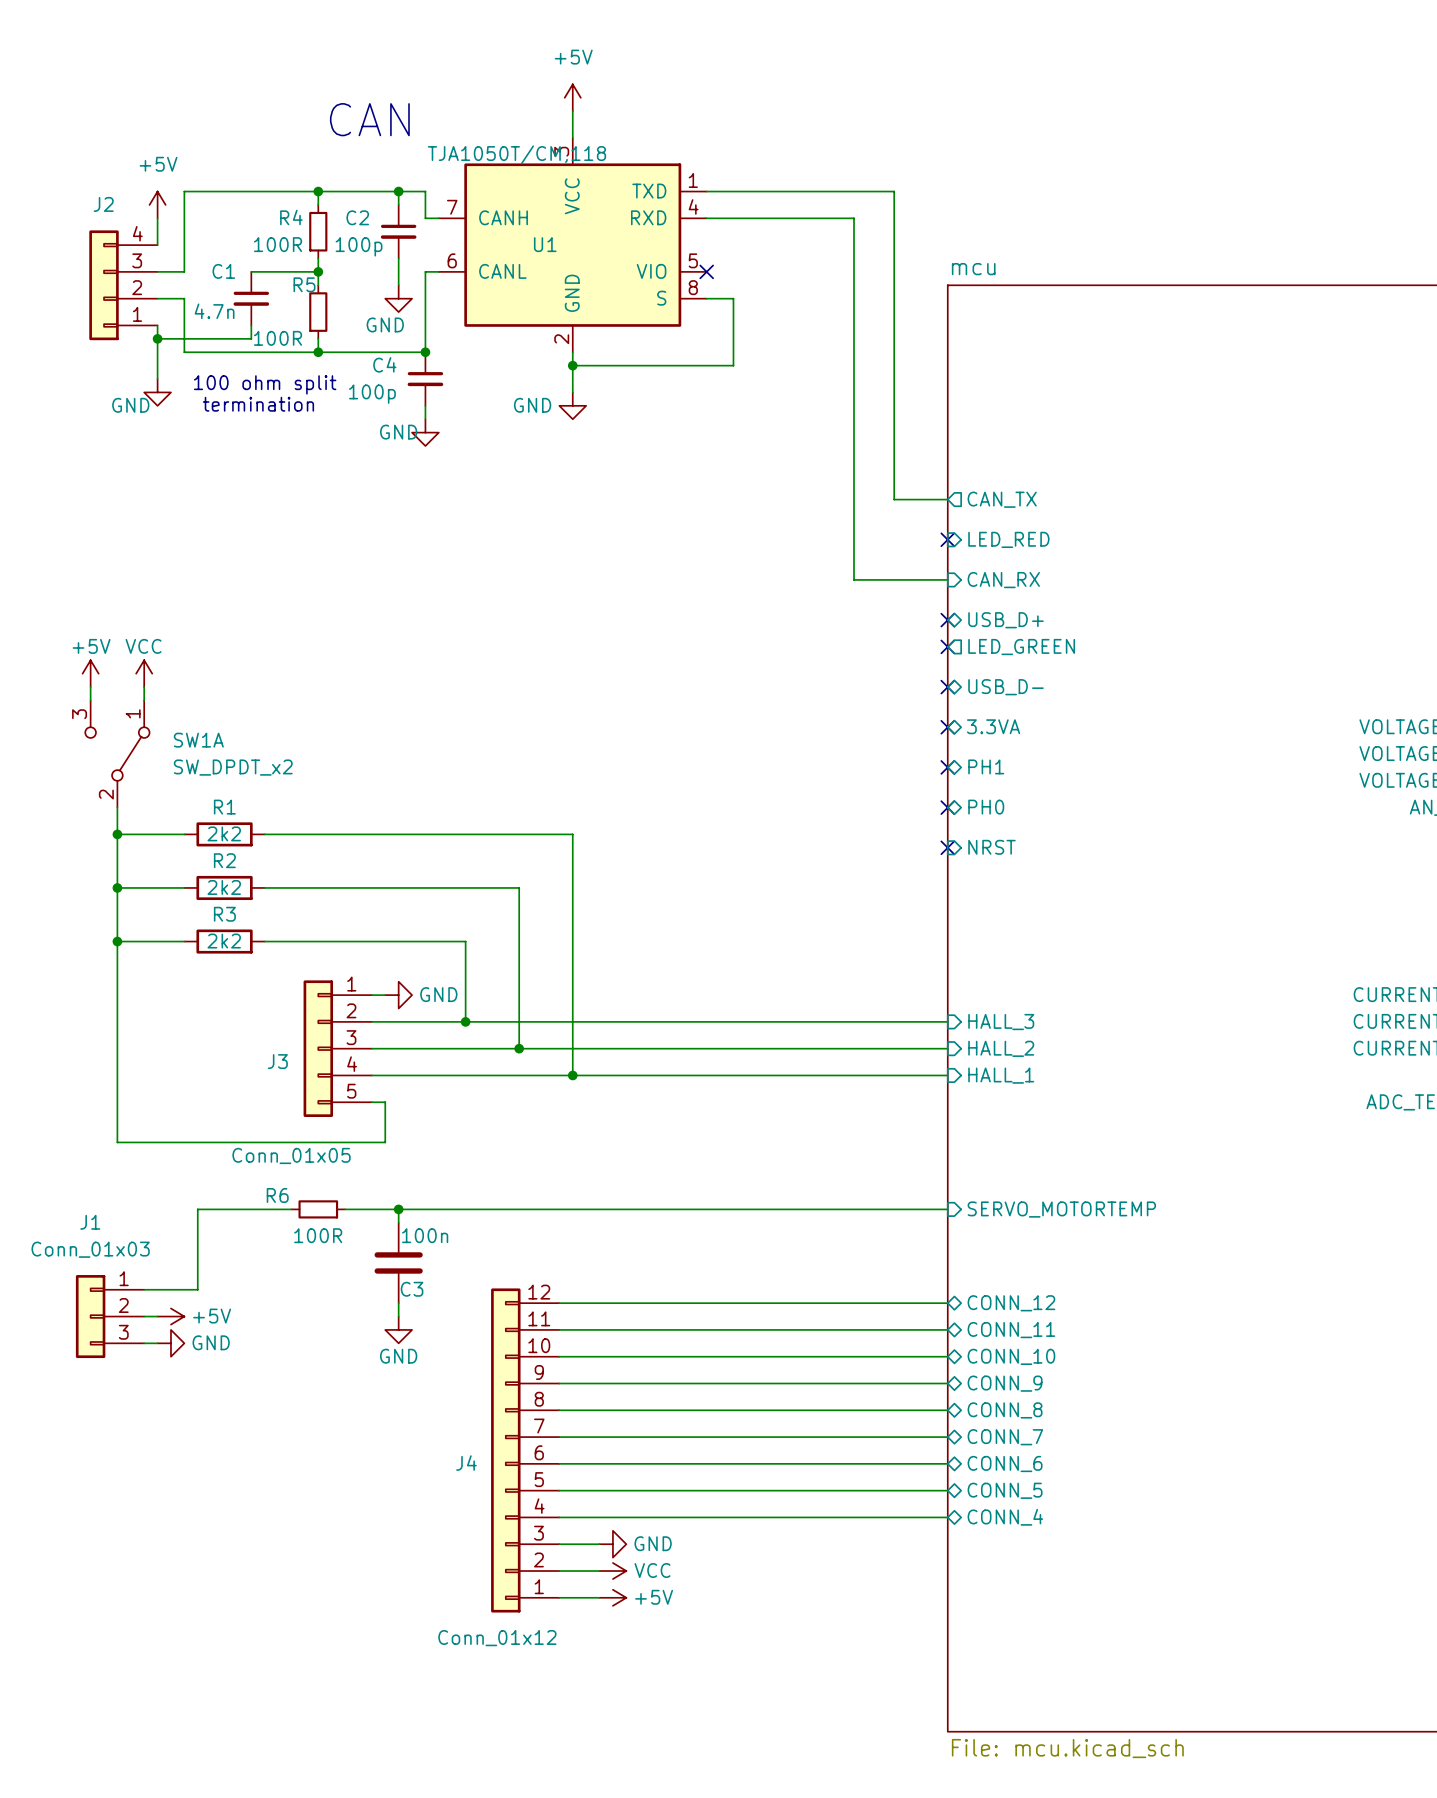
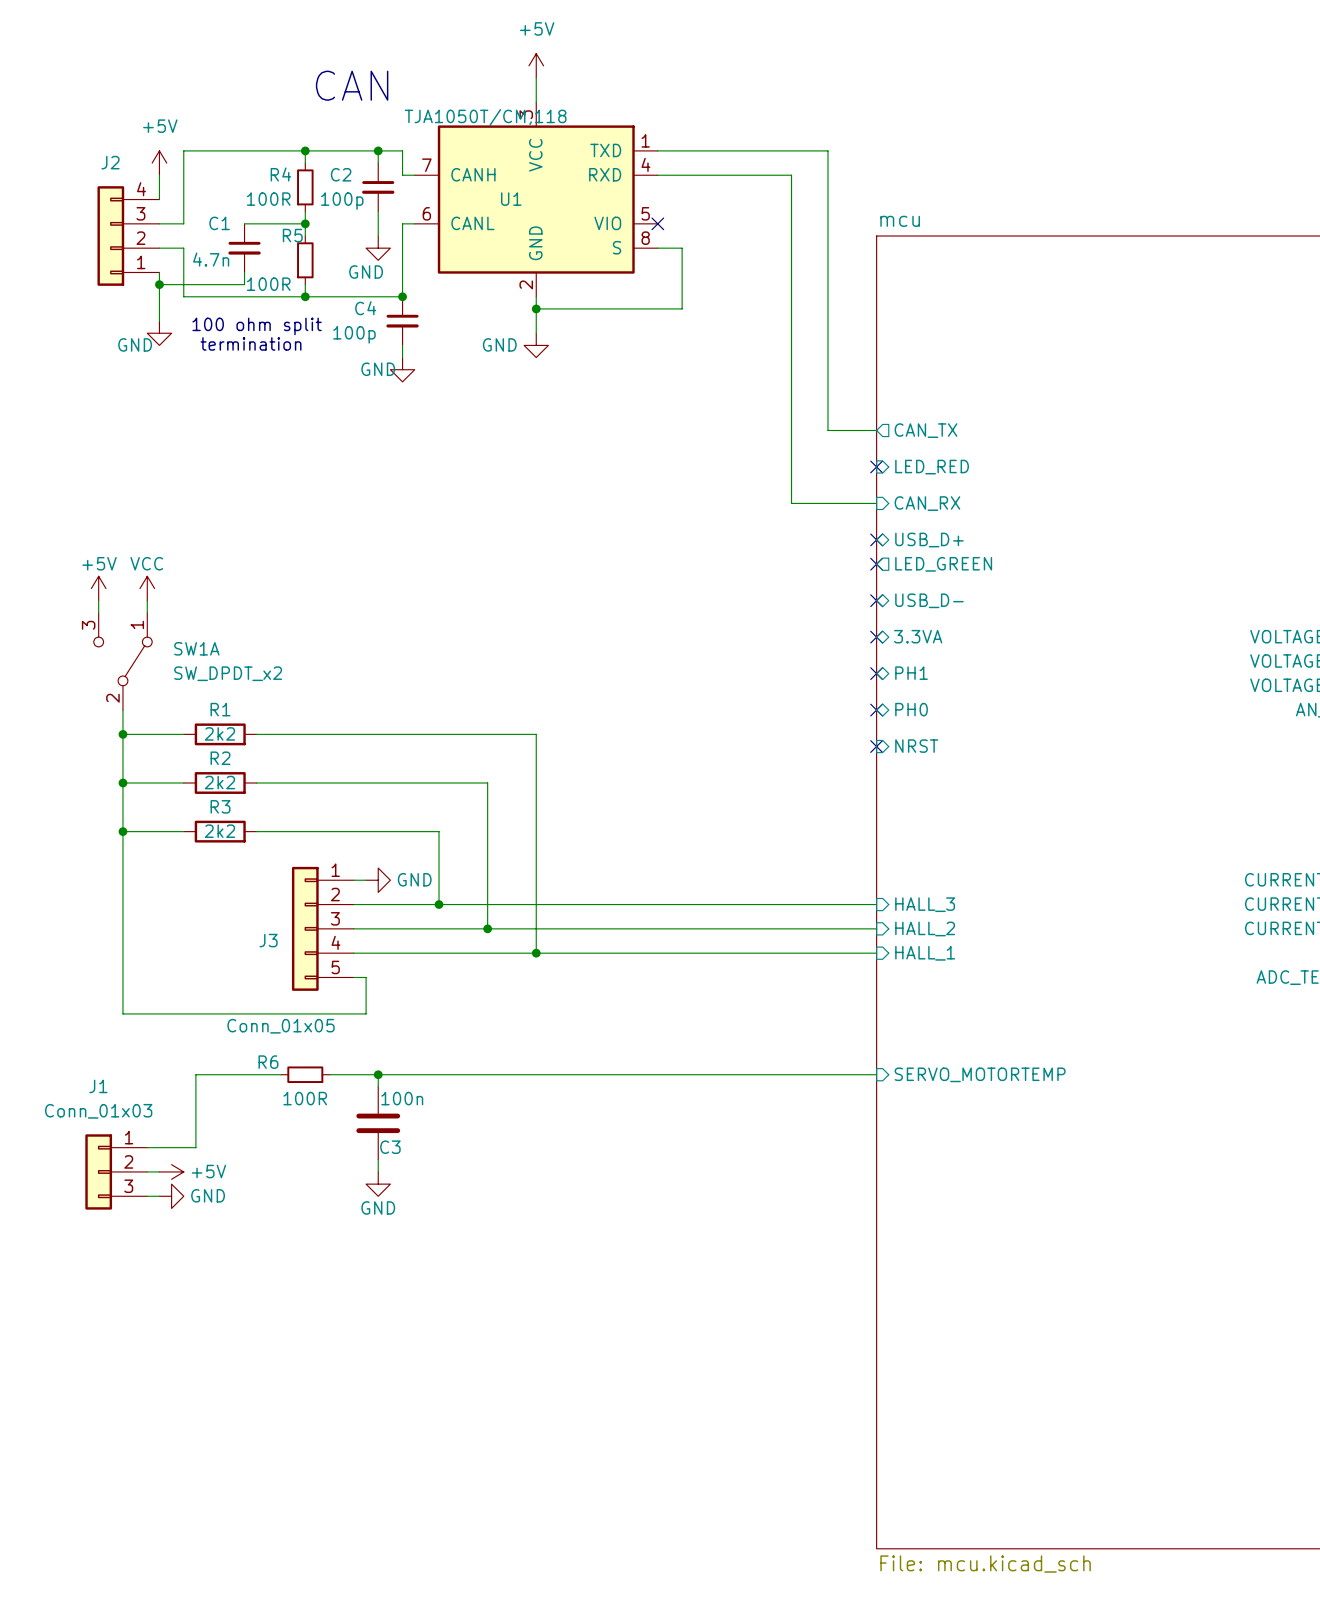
wire: (559, 1303) (947, 1303) -> none
sheet pin: CONN_12 (1011, 1303) -> none
wire: (559, 1329) (947, 1329) -> none
sheet pin: CONN_11 (1011, 1330) -> none
wire: (559, 1356) (947, 1356) -> none
sheet pin: CONN_10 (1011, 1356) -> none
wire: (559, 1383) (947, 1383) -> none
sheet pin: CONN_9 (1005, 1383) -> none
wire: (559, 1410) (947, 1410) -> none
sheet pin: CONN_8 (1005, 1410) -> none
wire: (559, 1437) (947, 1437) -> none
sheet pin: CONN_7 (1005, 1437) -> none
J4: Conn_01x12 (525, 1450) -> none
wire: (559, 1463) (947, 1463) -> none
sheet pin: CONN_6 (1005, 1464) -> none
wire: (559, 1490) (947, 1490) -> none
sheet pin: CONN_5 (1005, 1490) -> none
wire: (559, 1517) (947, 1517) -> none
sheet pin: CONN_4 (1005, 1517) -> none
wire: (559, 1544) (599, 1544) -> none
power symbol: GND (612, 1544) -> none
wire: (559, 1571) (599, 1571) -> none
power symbol: VCC (612, 1571) -> none
wire: (559, 1597) (599, 1597) -> none
power symbol: +5V (612, 1597) -> none

